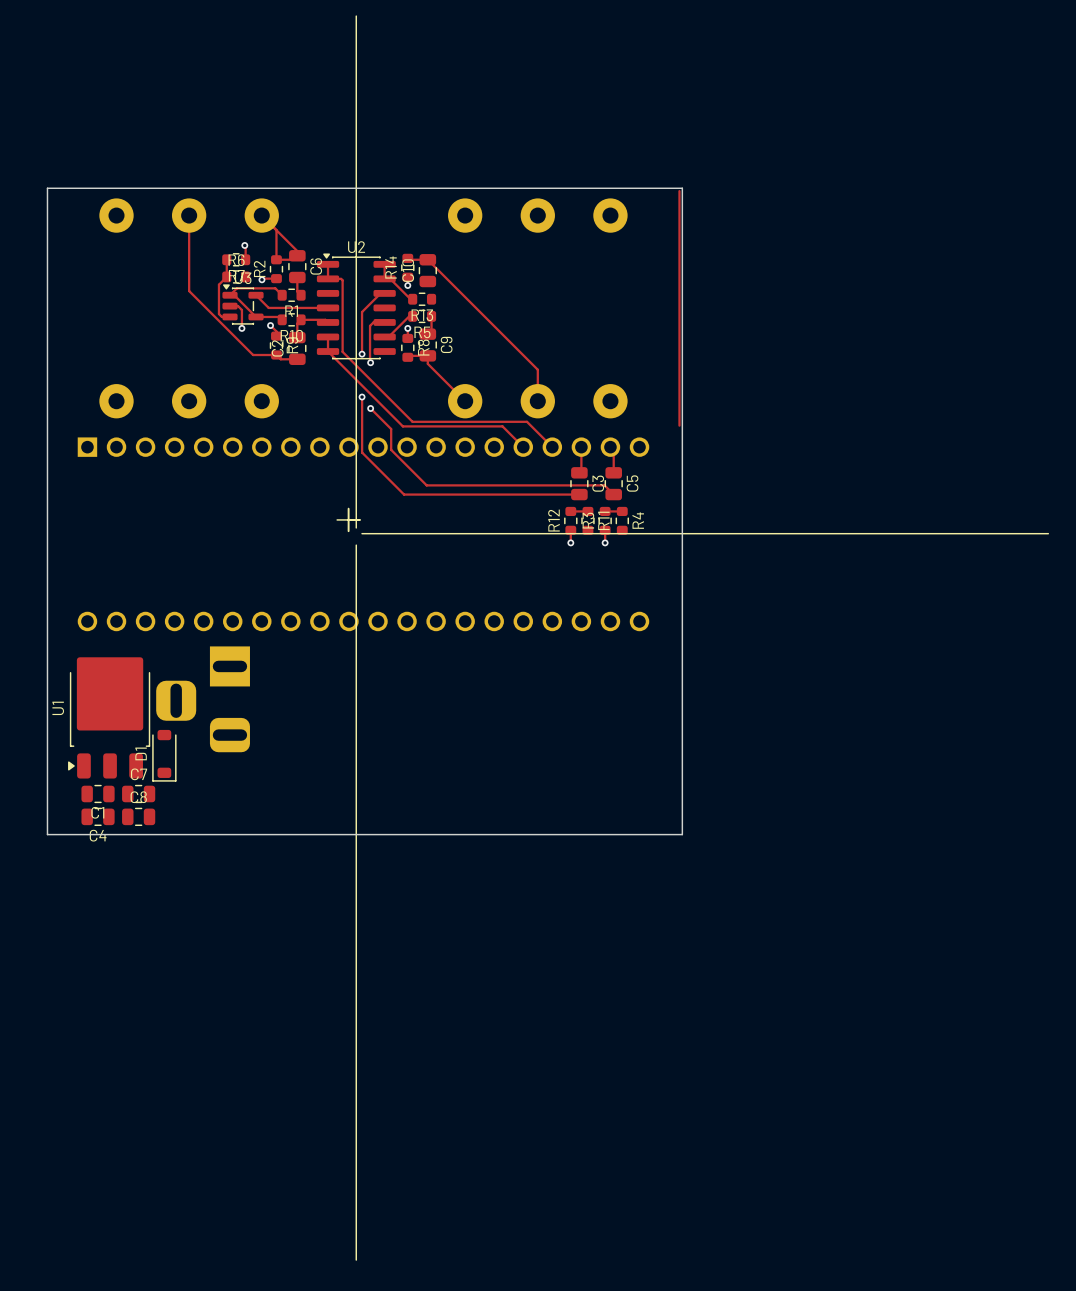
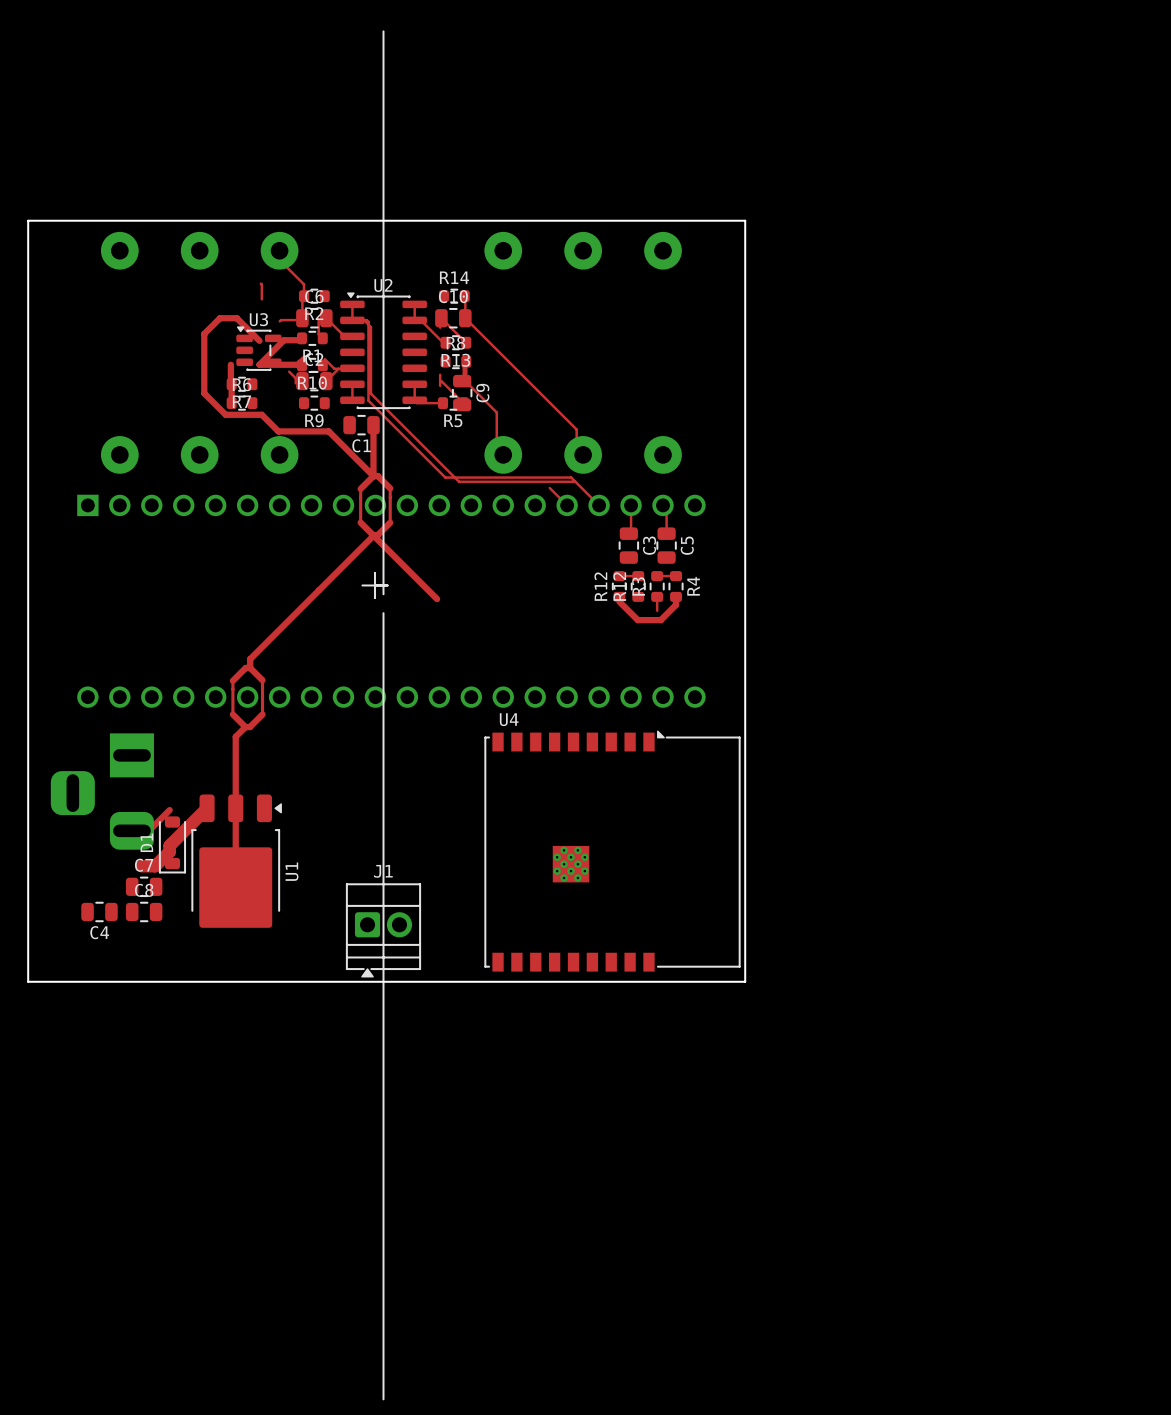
board edge: (47, 188) (47, 834) (682, 834) (682, 188) -> (43, 220) (28, 220) (28, 981) (745, 981) (745, 220) (742, 220)
track: (679, 191) (679, 425) -> none
track: (189, 215) (189, 291) (253, 355) (276, 355) (280, 359) (297, 359) -> none
track: none -> (270, 250) (303, 284) (302, 318)
track: (261, 215) (297, 251) (297, 255) (293, 259) (276, 259) (276, 230) -> none
via: (244, 245) -> none
track: none -> (464, 296) (465, 318) (576, 429) (576, 454)
track: (407, 258) (427, 259) (537, 369) (537, 401) -> none
track: (226, 259) (226, 276) (218, 284) (218, 314) (221, 316) (230, 316) -> none
R7 position: (236, 259) -> (242, 384)
C6 rotation: 0° (297, 266) -> 90° clockwise (314, 318)
C6 name position: C6 (316, 266) -> C6 (314, 296)
R14 rotation: 0° (407, 267) -> 90° clockwise (454, 296)
R14 position: (407, 267) -> (454, 296)
R2 name position: R2 (259, 268) -> R2 (314, 313)
R2 rotation: 0° (276, 269) -> 90° clockwise (314, 296)
R2 position: (276, 269) -> (314, 296)
C10 rotation: 0° (427, 270) -> 90° clockwise (453, 318)
R6 position: (236, 276) -> (242, 403)
track: none -> (326, 318) (344, 336)
track: none -> (441, 318) (463, 340)
track: none -> (352, 320) (364, 320) (370, 327) (370, 393) (459, 481) (575, 481)
via: (261, 279) -> none
via: (407, 285) -> none
track: (384, 293) (380, 293) (362, 312) (362, 354) -> none
track: (256, 295) (268, 307) (328, 307) -> none
track: (282, 295) (275, 288) (236, 288) (230, 295) (234, 295) (256, 316) (279, 316) (282, 319) -> none
track: none -> (303, 340) (284, 340) (259, 364) (298, 364) (303, 359)
track: none -> (259, 340) (236, 318) (220, 318) (204, 333) (204, 393) (225, 414) (261, 414) (278, 431) (328, 431) (373, 476)
track: (230, 306) (238, 306) (241, 310) (241, 328) -> none
track: none -> (463, 359) (463, 379) (496, 412) (496, 454)
track: (412, 316) (409, 316) (388, 336) (384, 336) -> none
track: none -> (230, 364) (231, 403)
track: none -> (338, 368) (326, 381)
track: (328, 322) (325, 319) (301, 319) (297, 323) (297, 337) -> (352, 368) (334, 368) (324, 359)
track: (384, 322) (373, 322) (370, 325) (370, 362) -> none
via: (270, 325) -> none
via: (241, 328) -> none
via: (407, 328) -> none
R5 name: R5 (422, 332) -> R8 (455, 343)
track: none -> (441, 381) (463, 403)
track: none -> (414, 384) (414, 400) (417, 403) (442, 403)
R9 rotation: 0° (276, 345) -> 90° clockwise (314, 403)
R9 position: (276, 345) -> (314, 403)
R8: (407, 347) -> none
C2 rotation: 0° (297, 348) -> 90° clockwise (314, 381)
track: (328, 351) (402, 426) (502, 426) (507, 431) -> none
via: (362, 354) -> none
R5: none -> (453, 403)
track: (407, 357) (427, 355) (427, 363) (465, 401) -> none
via: (370, 362) -> none
track: none -> (373, 425) (373, 476)
track: (362, 397) (362, 452) (404, 494) (579, 494) -> none
via: (362, 397) -> none
track: (370, 408) (391, 429) (391, 449) (426, 485) (604, 485) (613, 494) -> none
via: (370, 408) -> none
track: none -> (373, 476) (377, 476) (390, 488) (390, 522) (377, 535) (373, 535)
track: none -> (373, 476) (360, 488) (360, 522) (437, 599)
track: none -> (374, 535) (250, 659) (250, 667)
R11 name: R11 (603, 520) -> R12 (619, 586)
line: (361, 533) (1048, 533) -> none
track: (570, 534) (570, 542) -> (619, 601) (637, 620) (660, 620) (676, 604) (676, 599)
via: (570, 542) -> none
via: (605, 542) -> none
track: none -> (250, 667) (262, 680) (262, 714) (249, 727) (245, 727)
track: none -> (250, 667) (245, 667) (232, 680) (232, 714) (245, 727)
track: none -> (245, 727) (235, 736) (235, 887)
part position: (203, 699) -> (102, 791)
U1 rotation: 0° (109, 717) -> 180° (236, 861)
U1 position: (109, 717) -> (236, 861)
track: none -> (207, 808) (169, 845) (169, 851) (155, 866) (141, 866)
track: none -> (169, 810) (148, 830) (131, 830)
U4: none -> (612, 851)
C1 position: (98, 793) -> (361, 425)
J1: none -> (383, 930)

